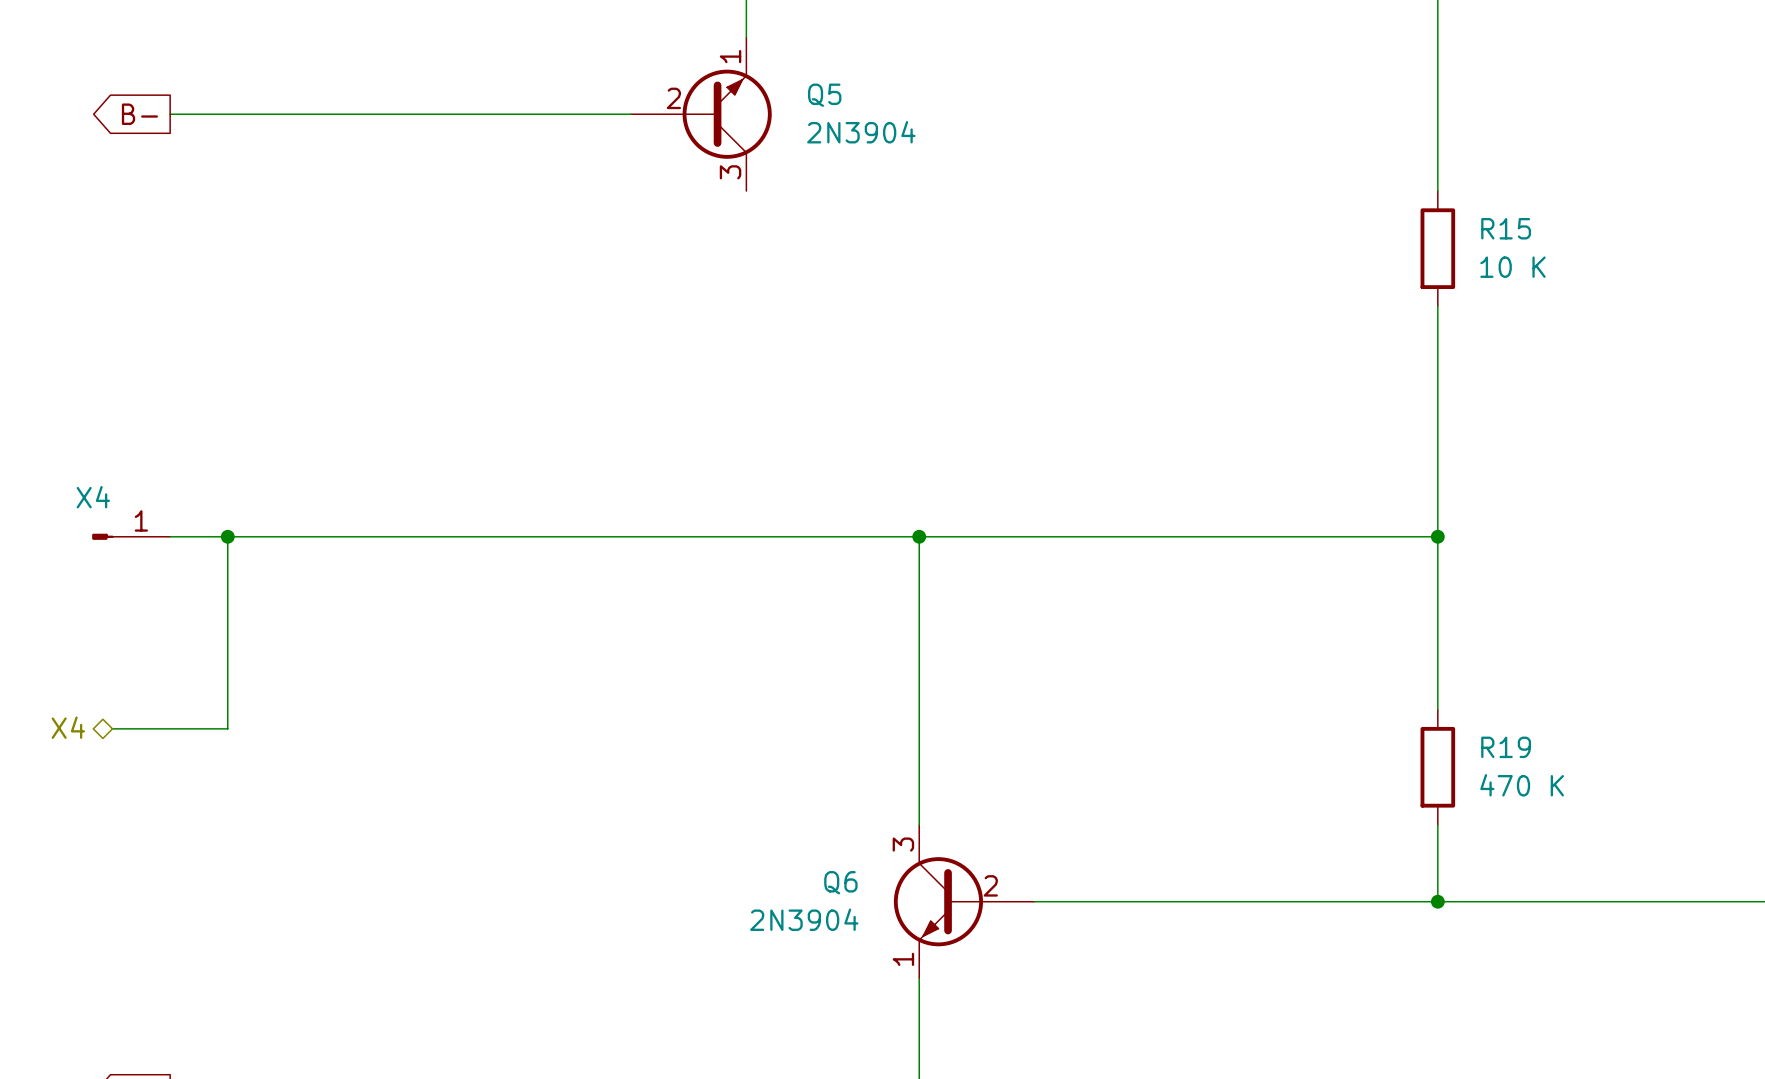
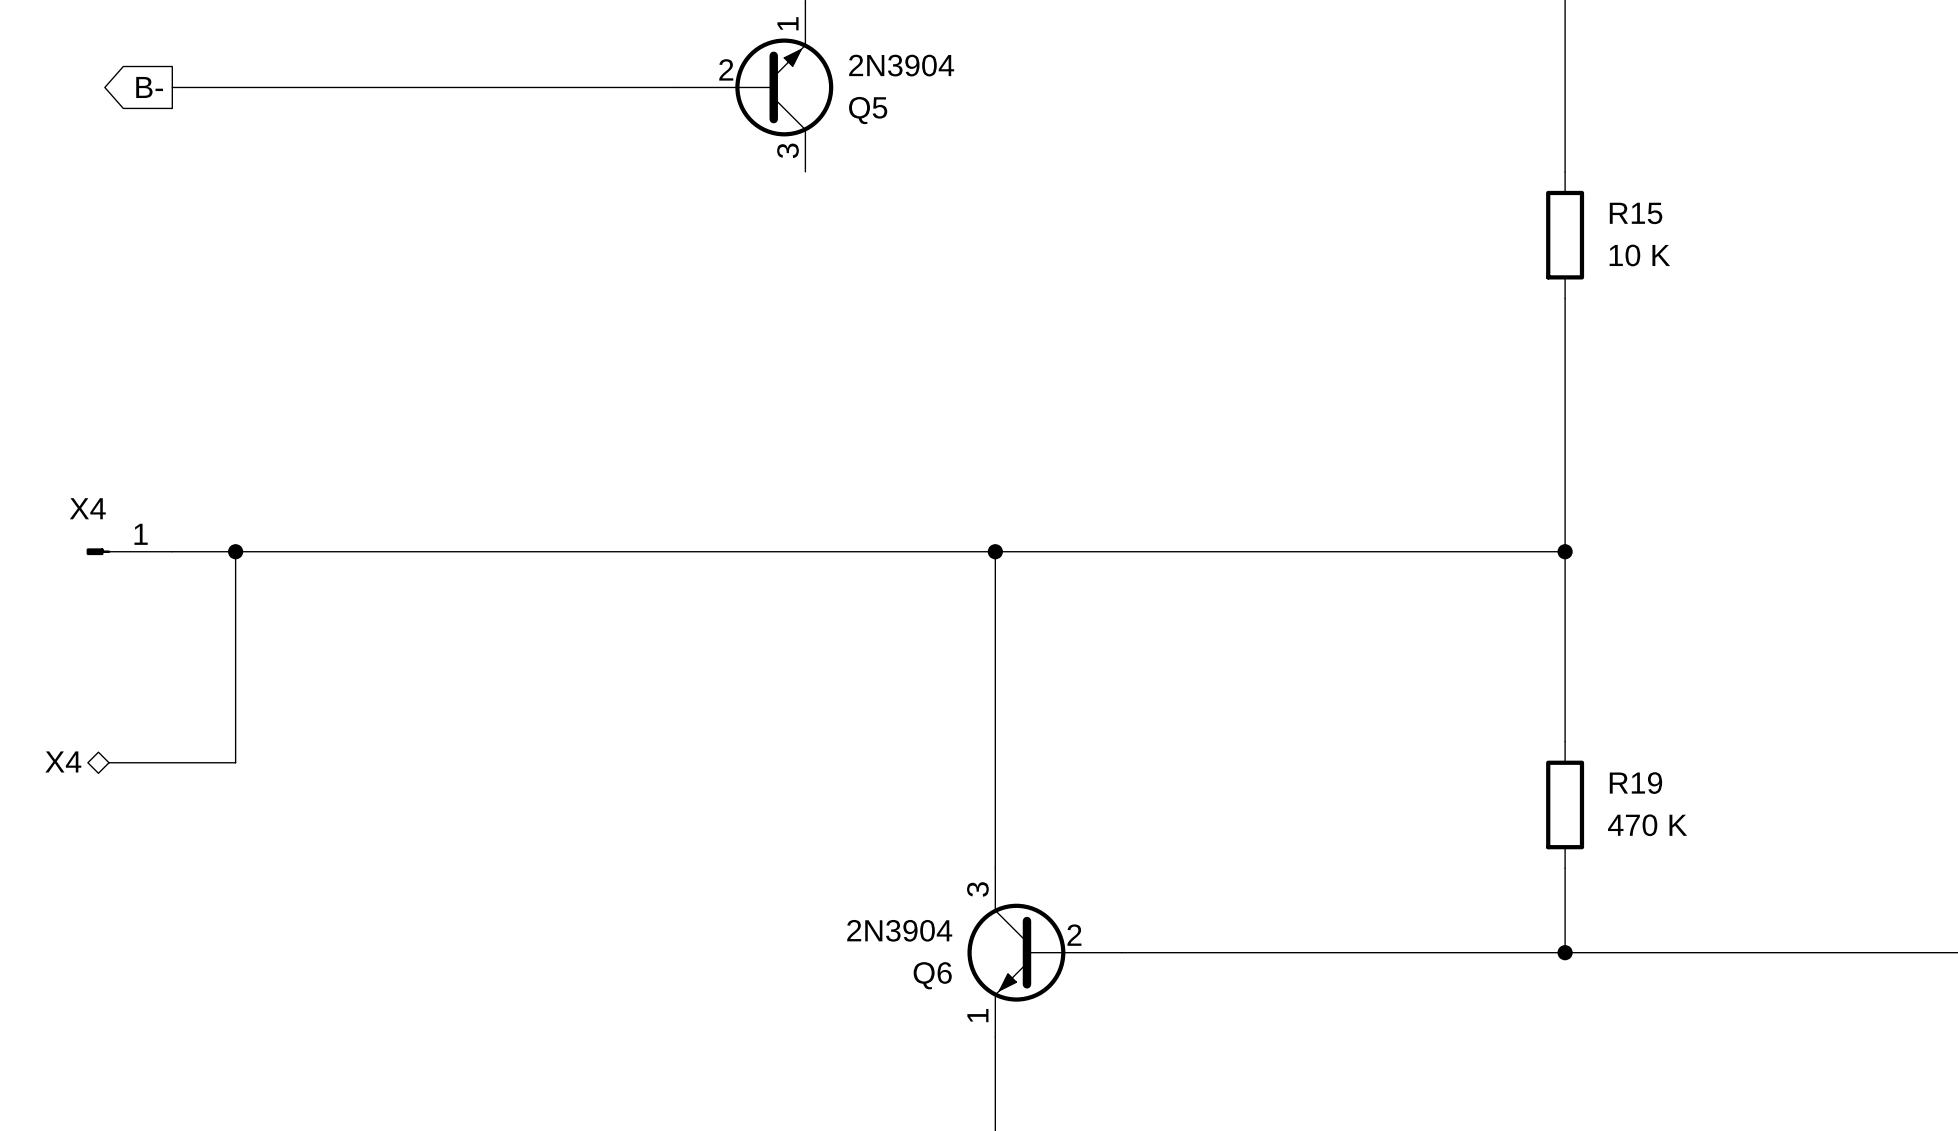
Q5 name position: Q5 (824, 95) -> Q5 (868, 110)
Q5 value position: 2N3904 (861, 132) -> 2N3904 (901, 65)
Q6 name position: Q6 (840, 882) -> Q6 (932, 975)
Q6 value position: 2N3904 (804, 919) -> 2N3904 (899, 930)

